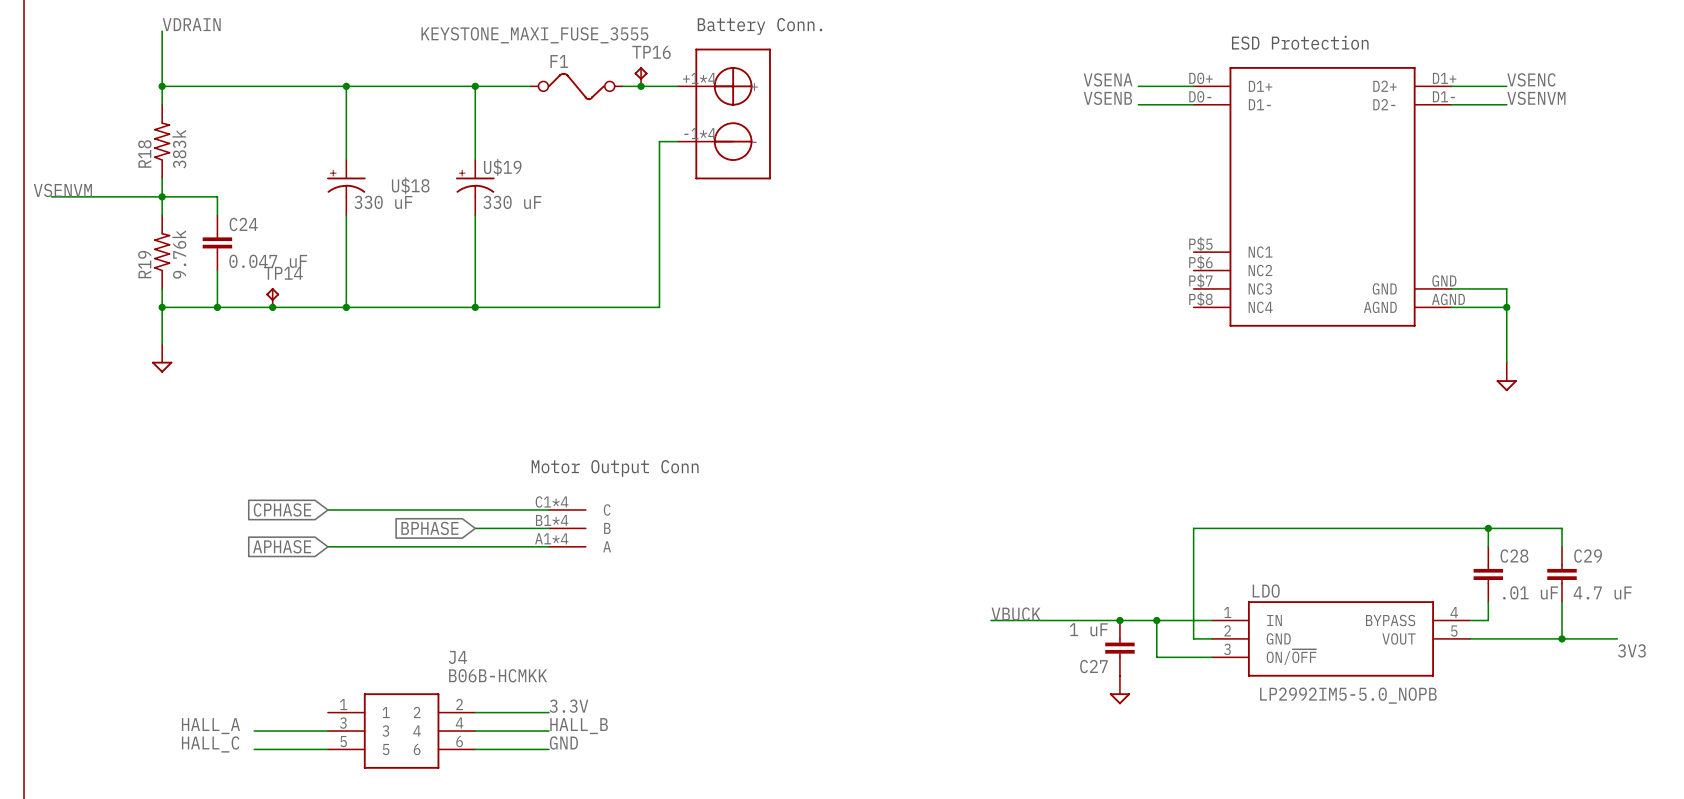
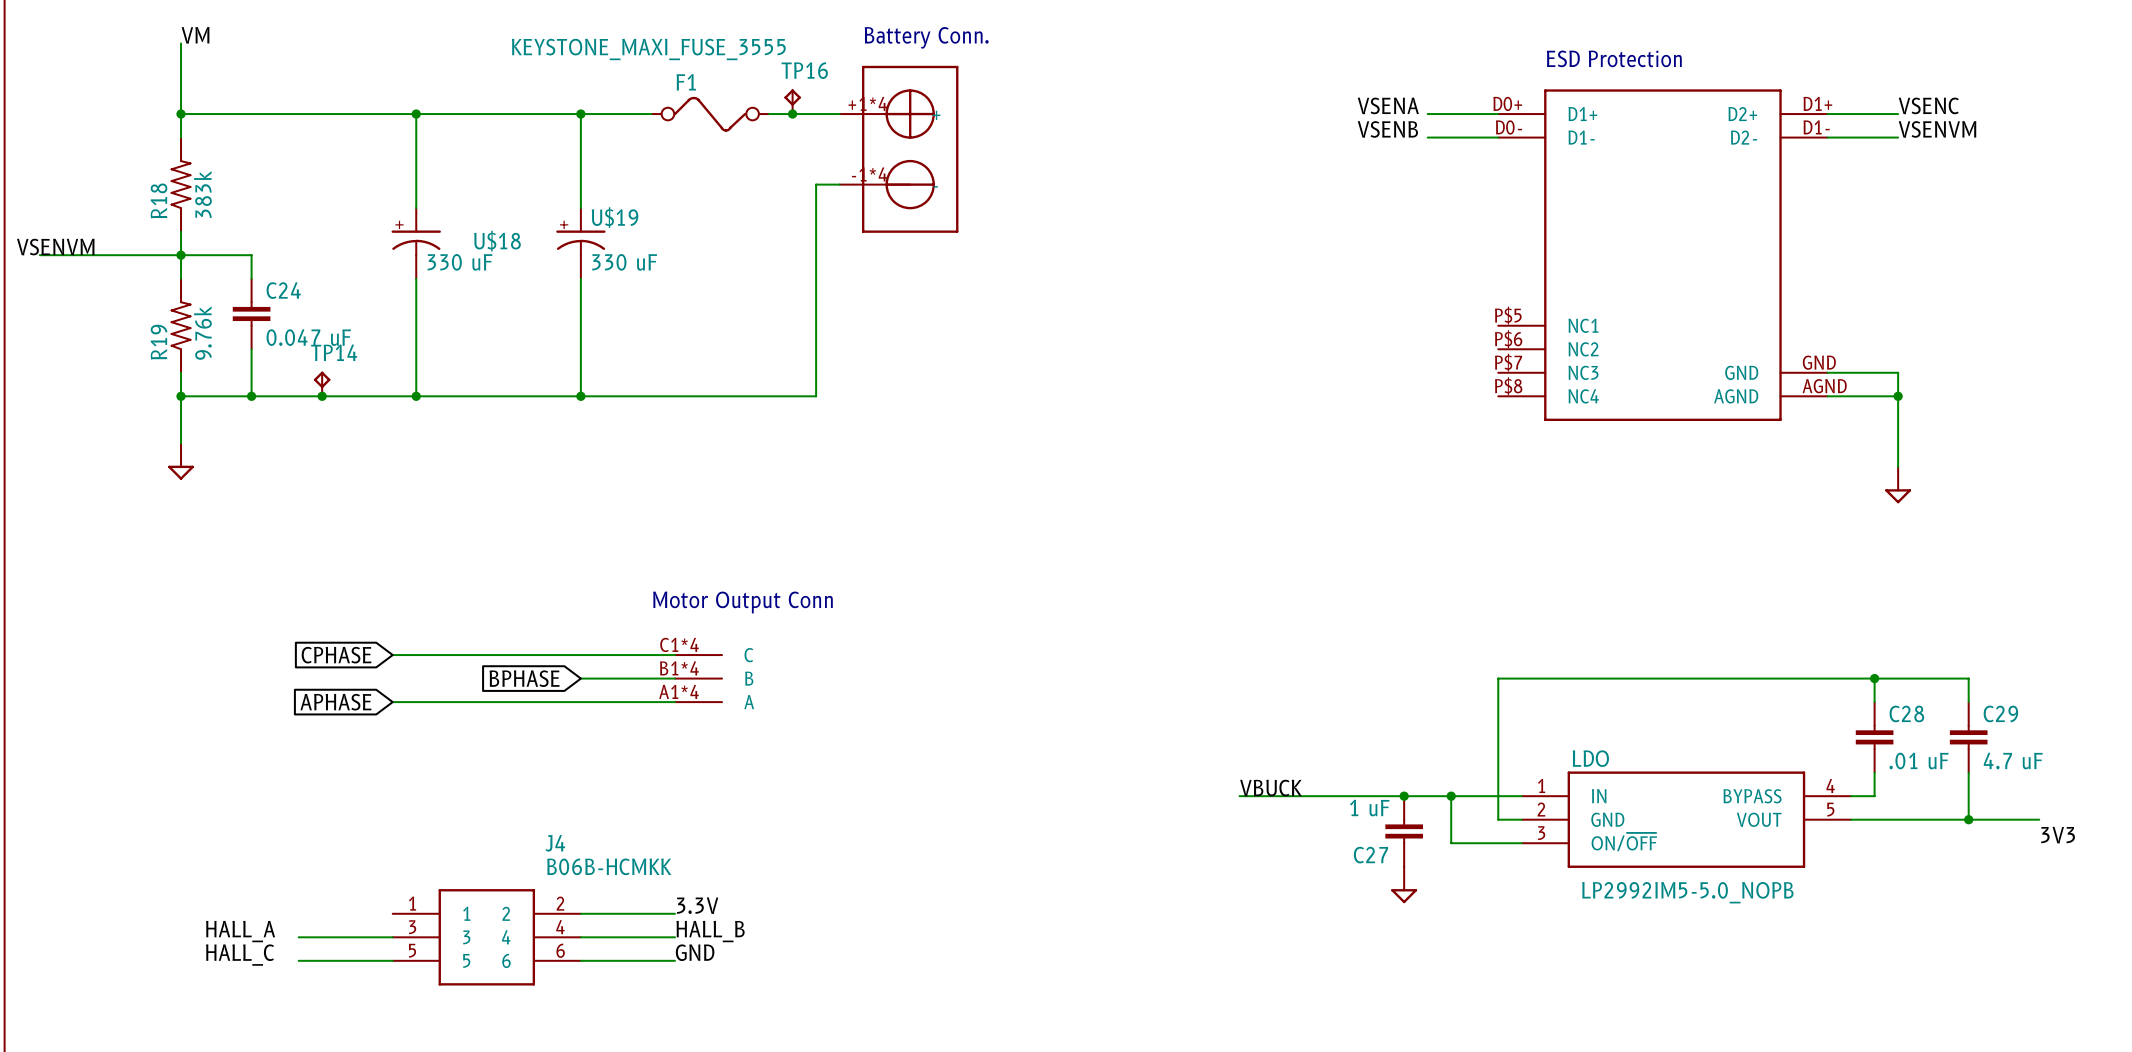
label: VDRAIN (191, 24) -> VM (195, 35)

